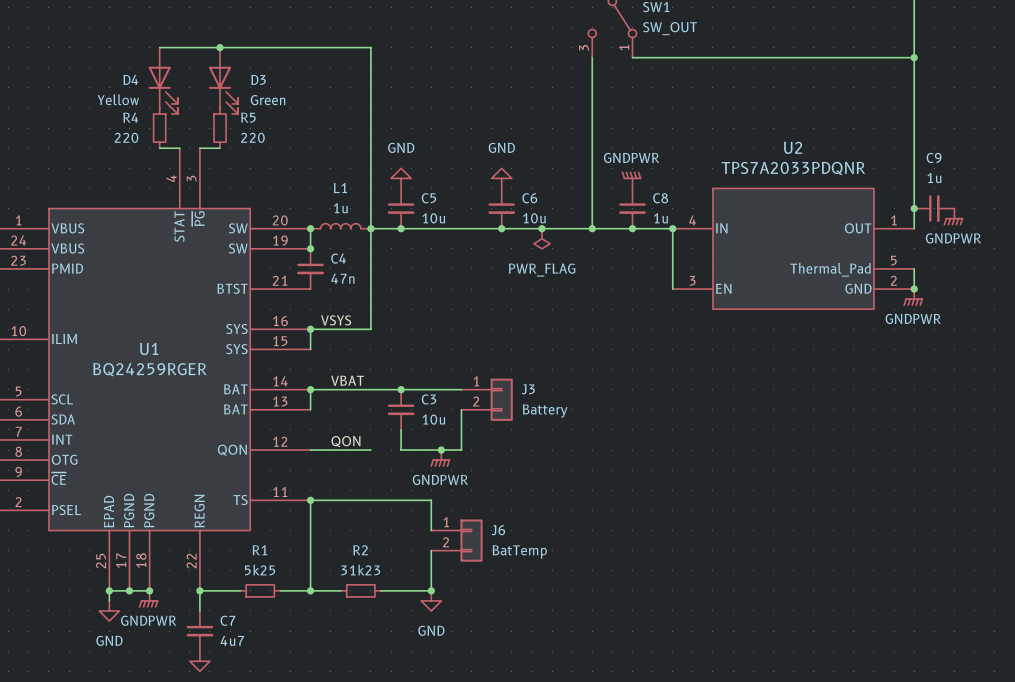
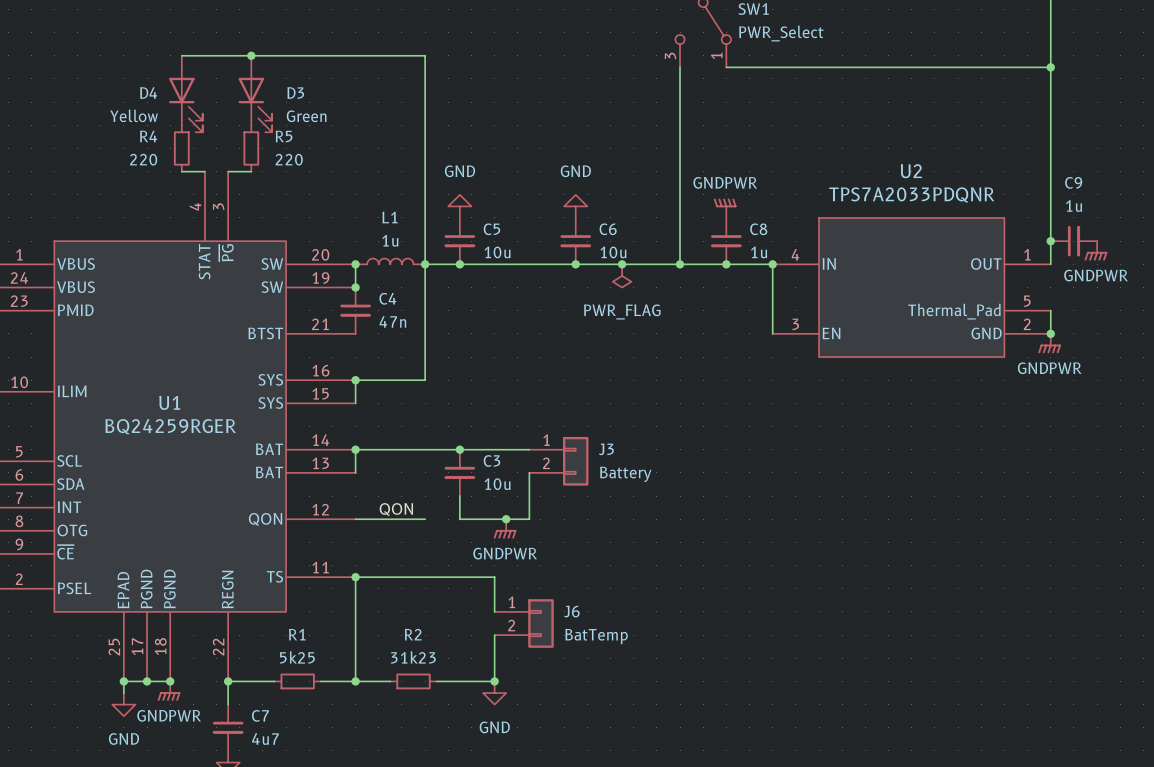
SW1 value: SW_OUT (670, 28) -> PWR_Select (781, 33)
label: VSYS (336, 320) -> none
label: VBAT (347, 380) -> none

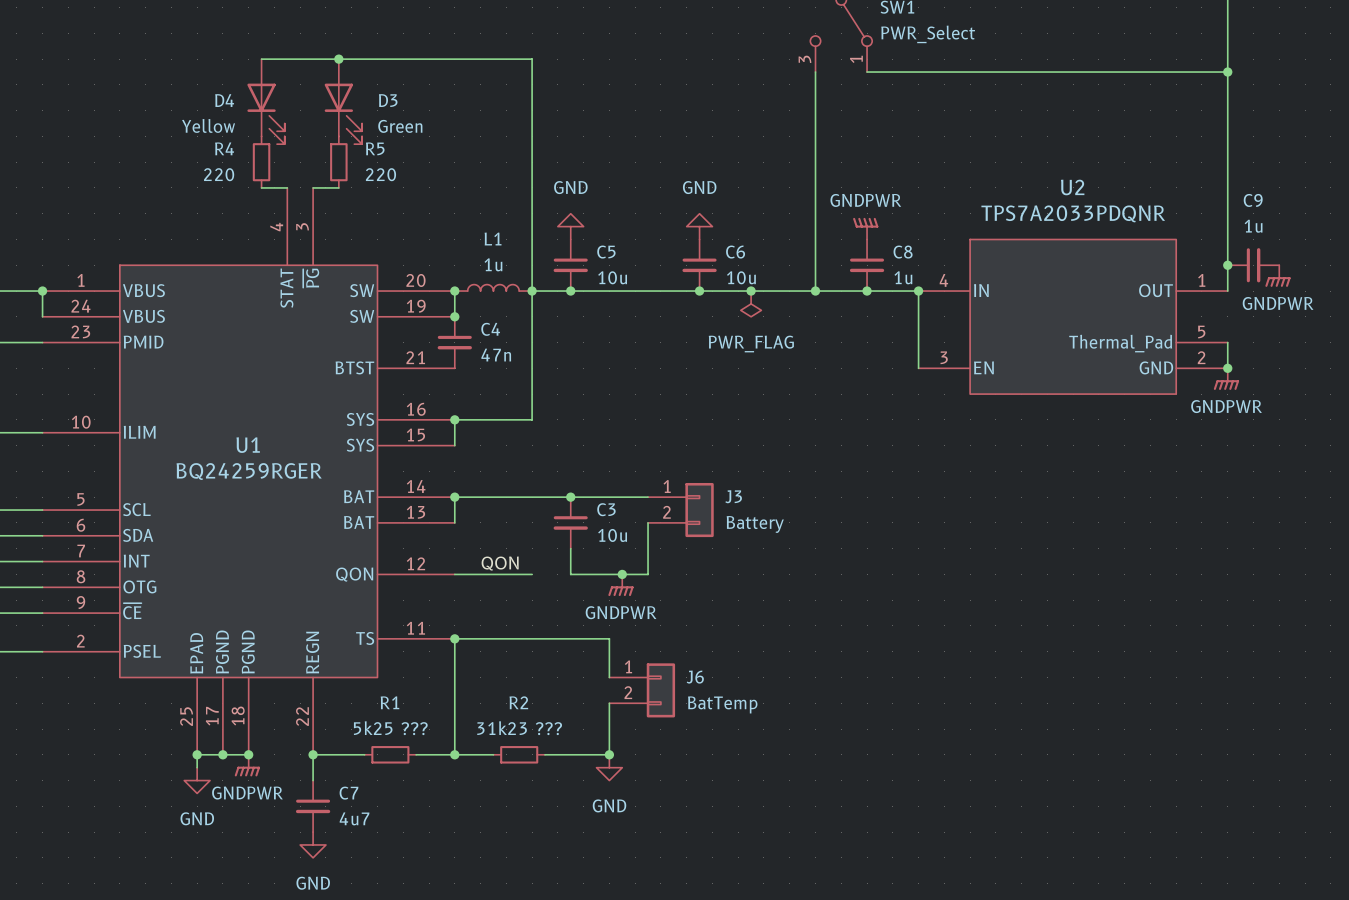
R1 value: 5k25 (297, 657) -> 5k25 ??? (390, 728)
R2 value: 31k23 (413, 657) -> 31k23 ??? (519, 728)

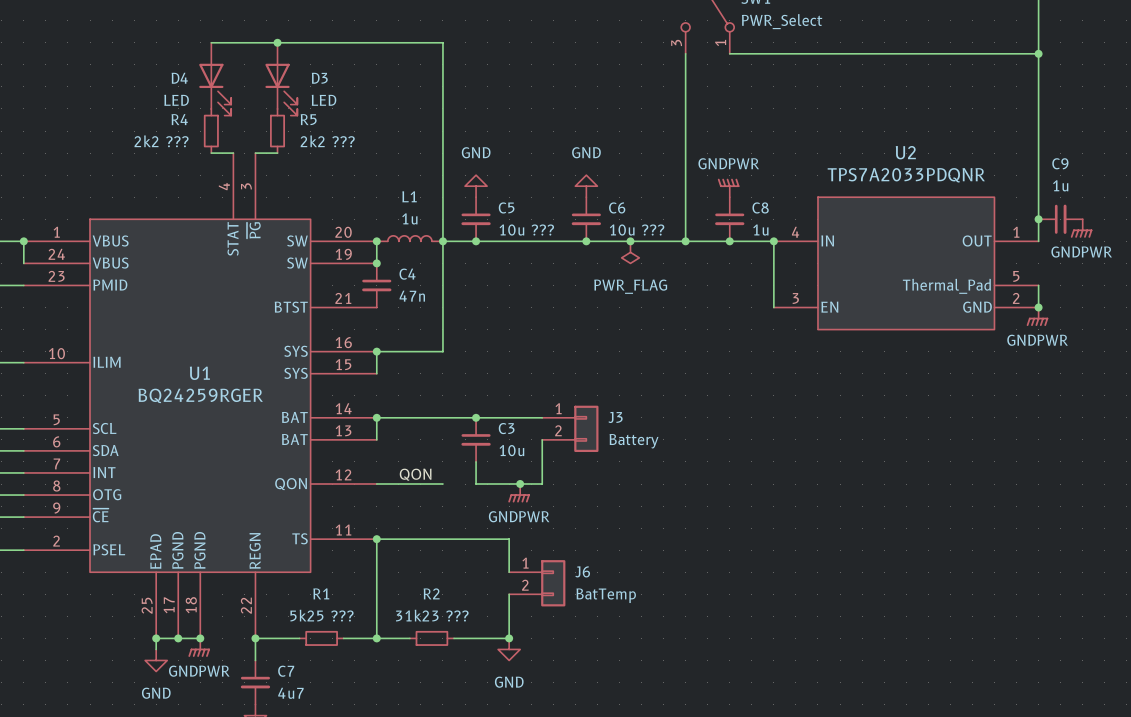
D4 value: Yellow (208, 125) -> LED (176, 100)
D3 value: Green (400, 126) -> LED (324, 100)
R4 value: 220 (219, 174) -> 2k2 ??? (161, 141)
R5 value: 220 (380, 174) -> 2k2 ??? (327, 141)
C5 value: 10u (612, 277) -> 10u ??? (526, 230)
C6 value: 10u (741, 277) -> 10u ??? (637, 230)

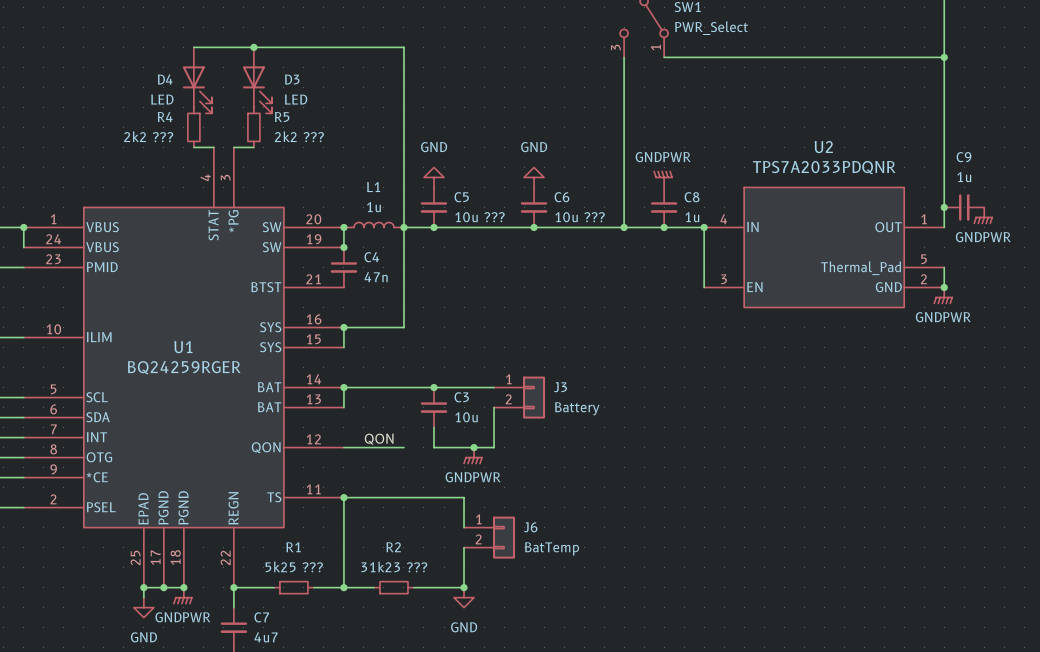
U1 pin name: ~{PG} (253, 230) -> *PG (233, 221)
junction: (630, 241) -> none
power symbol: PWR_FLAG (630, 252) -> none
U1 pin name: ~{CE} (100, 515) -> *CE (97, 477)

